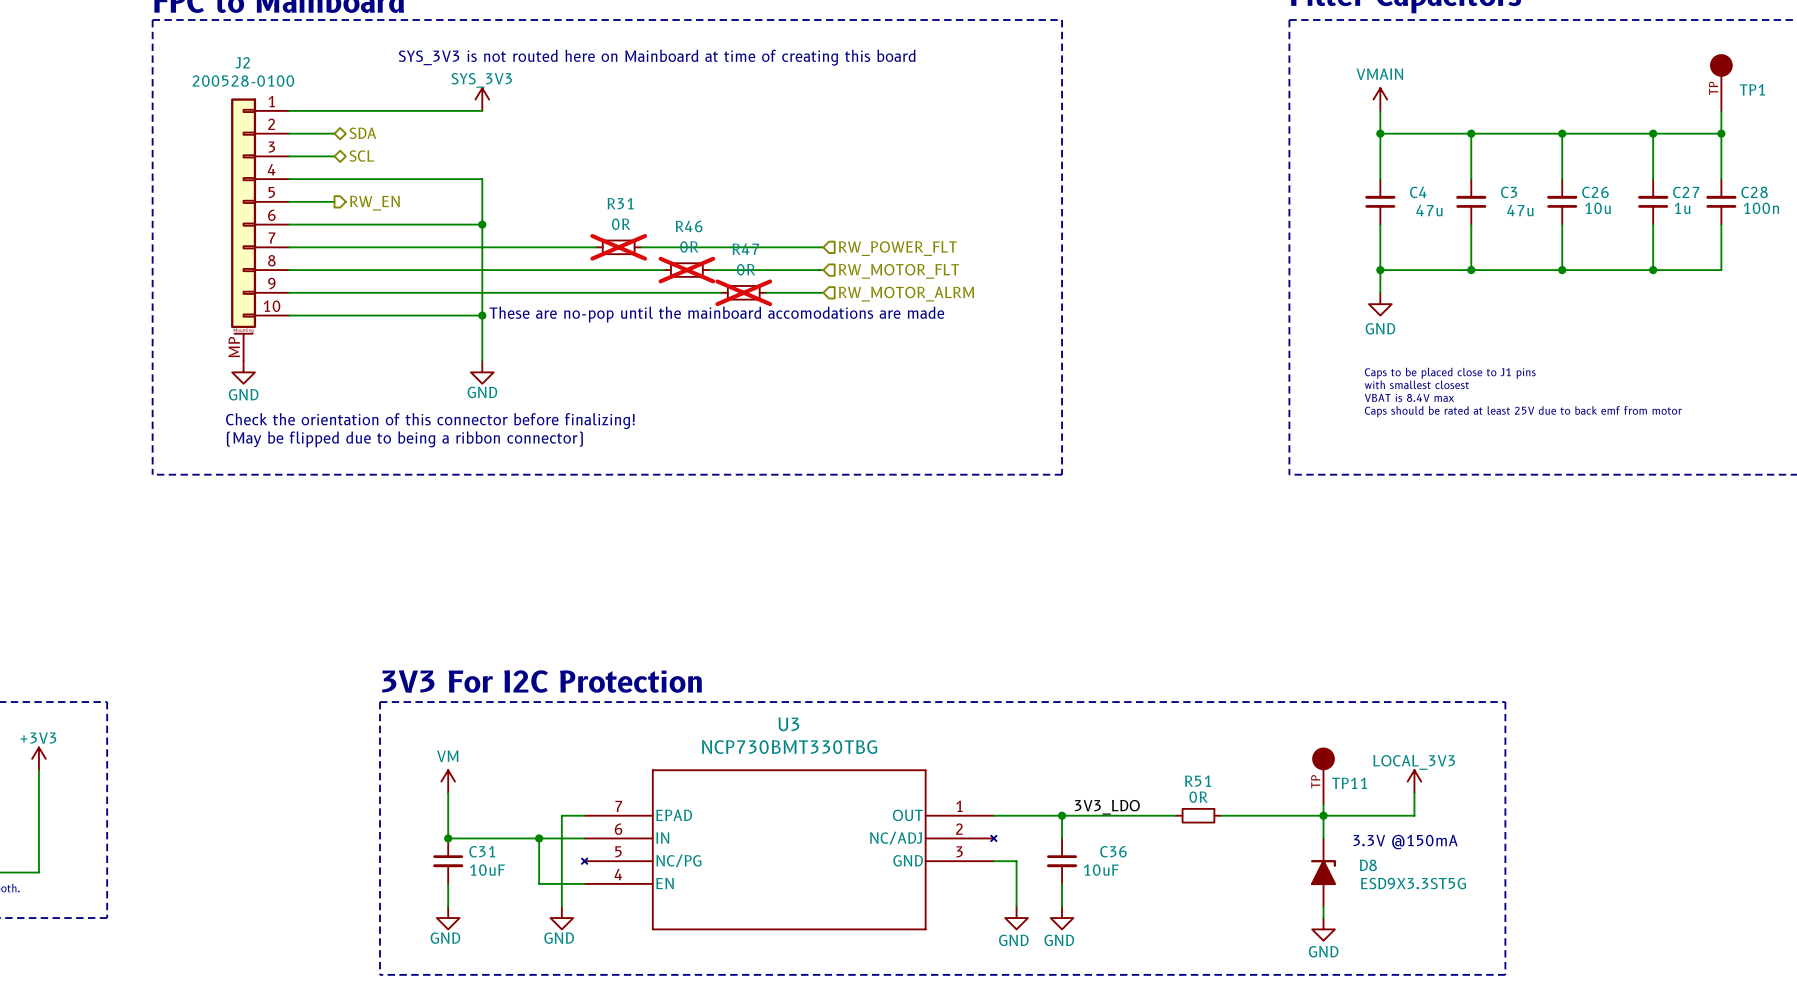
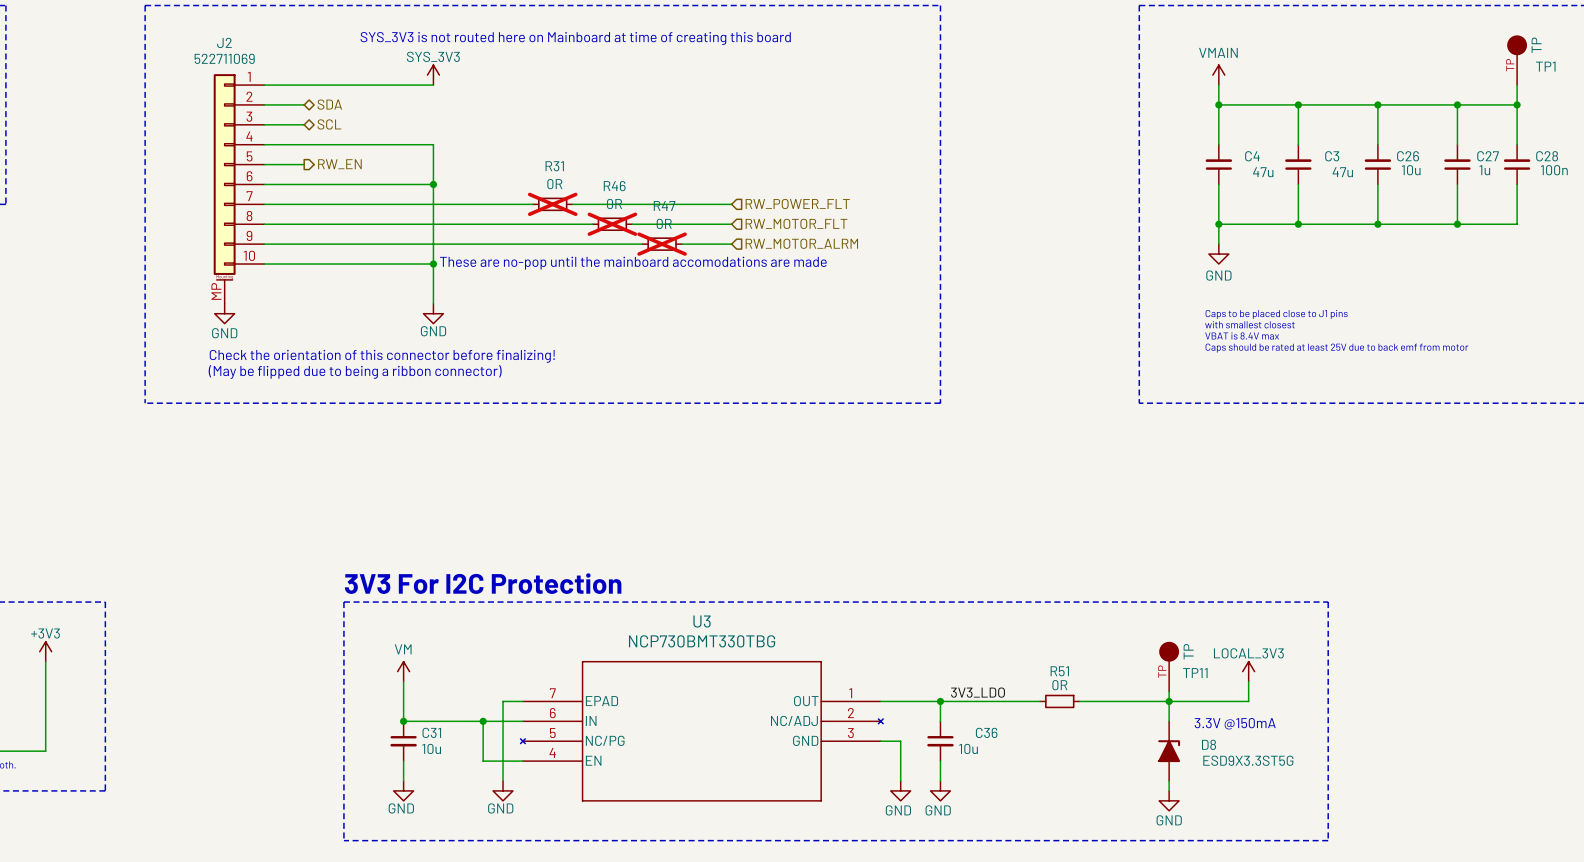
TP1 value: none -> TP (1536, 45)
J2 value: 200528-0100 (243, 81) -> 522711069 (224, 58)
TP11 value: none -> TP (1188, 651)
C31 value: 10uF (487, 870) -> 10u (431, 748)
C36 value: 10uF (1101, 870) -> 10u (968, 748)

